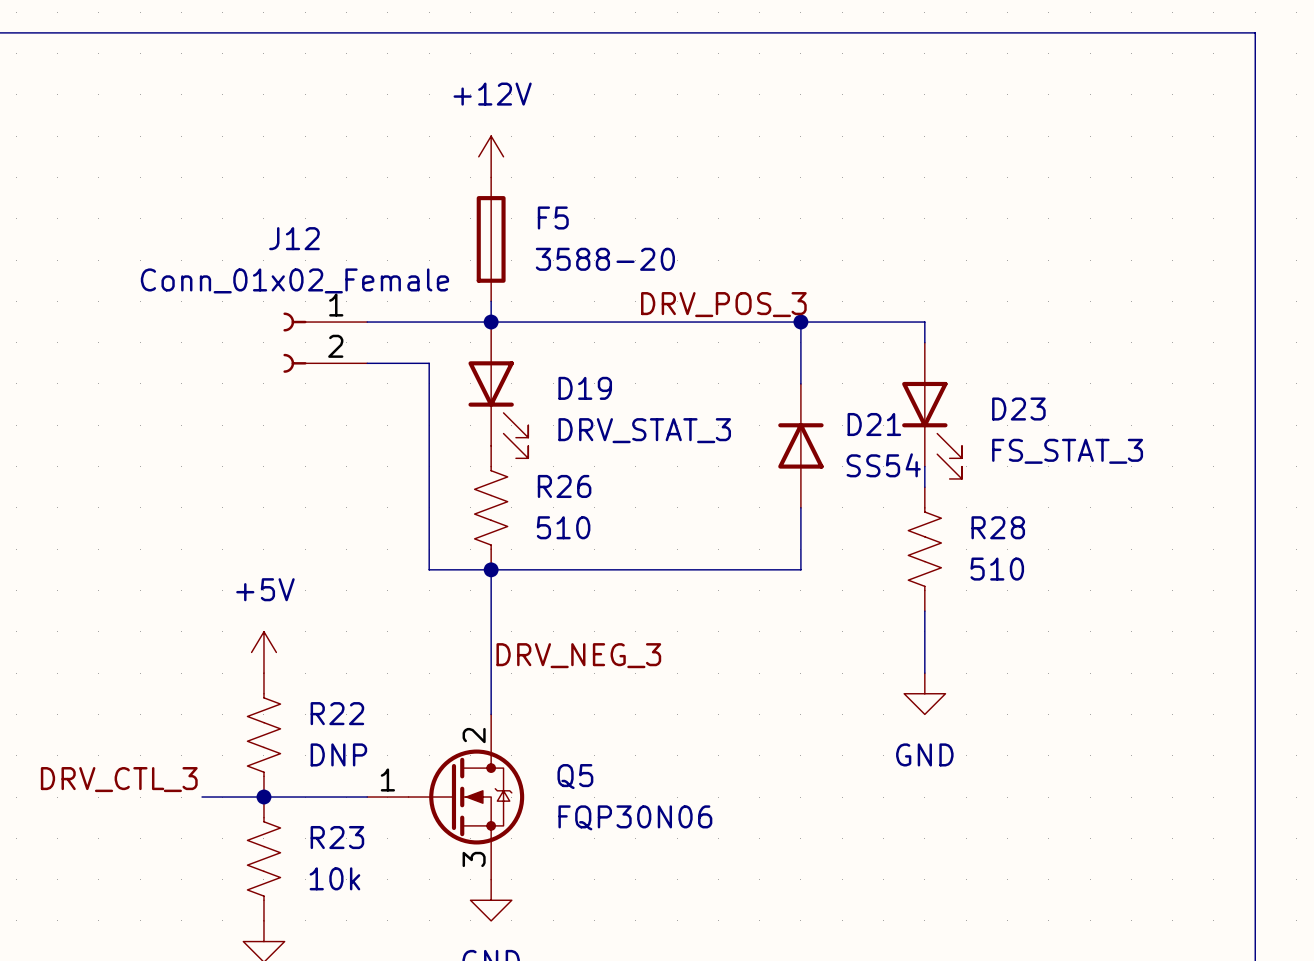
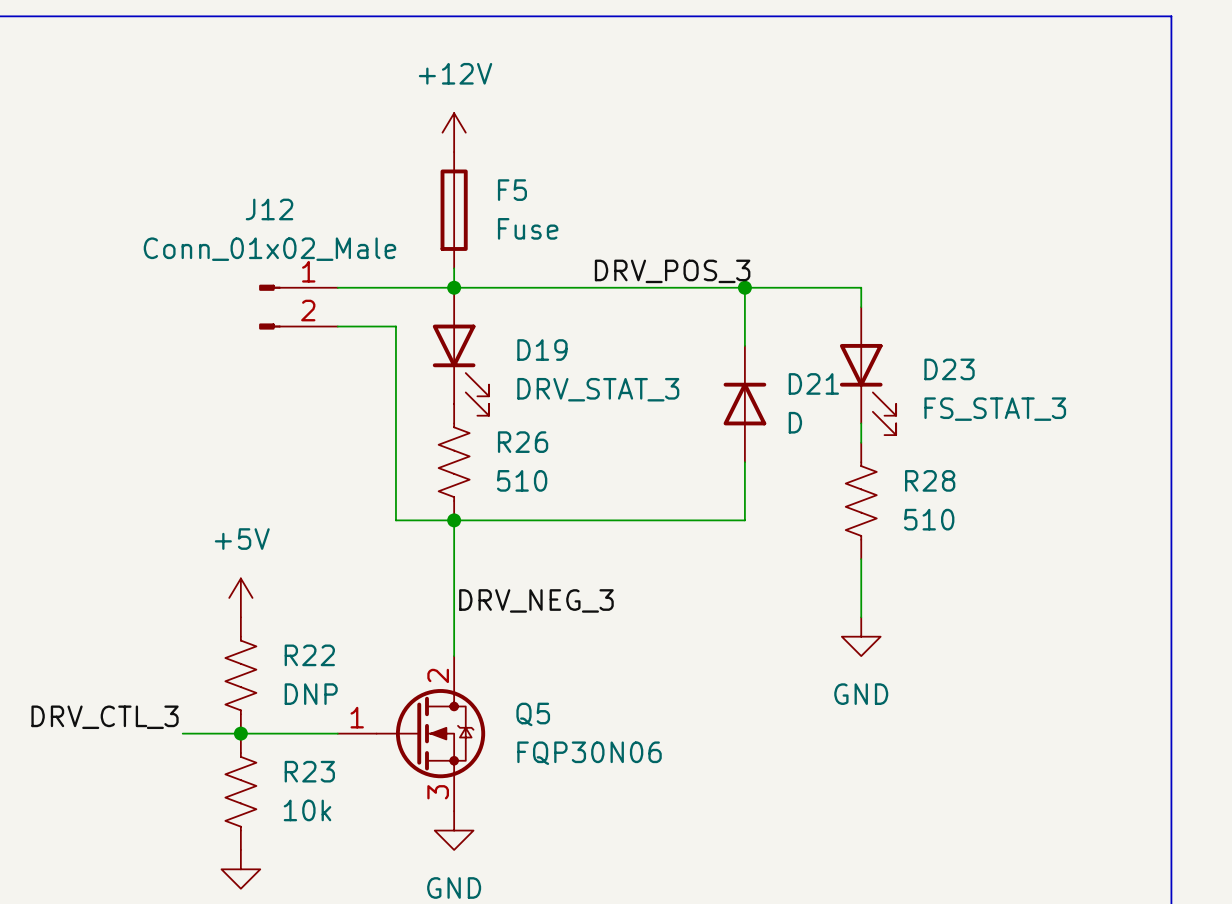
F5 value: 3588-20 (605, 259) -> Fuse (528, 228)
J12 value: Conn_01x02_Female (294, 280) -> Conn_01x02_Male (269, 249)
J12 symbol: [283, 312, 368, 373] -> [259, 284, 338, 330]
D21 value: SS54 (883, 465) -> D (795, 422)

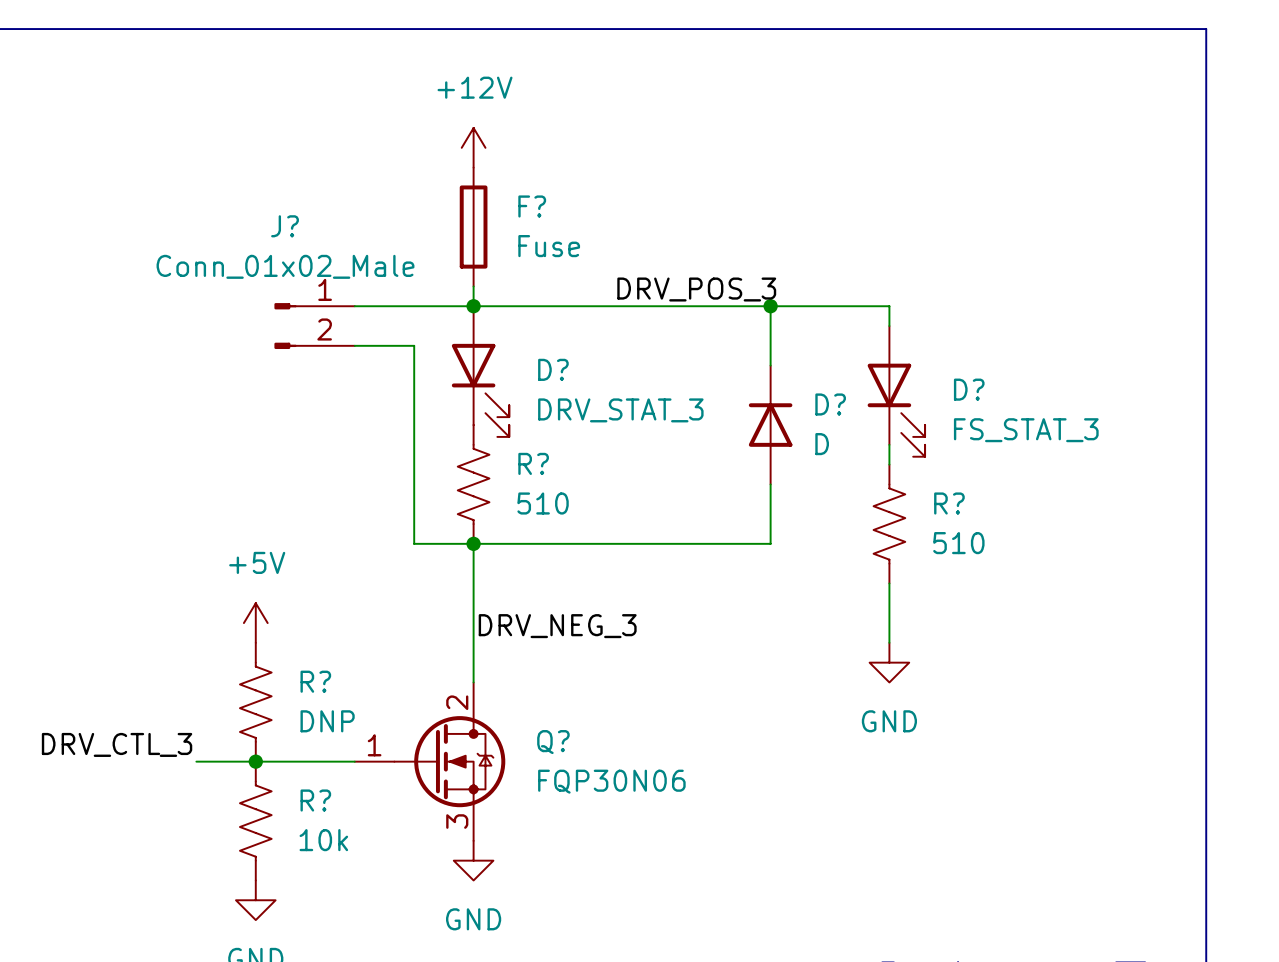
F5 name: F5 (512, 190) -> F? (532, 206)
J12 name: J12 (269, 209) -> J? (285, 226)
D19 name: D19 (542, 350) -> D? (553, 369)
D23 name: D23 (949, 369) -> D? (969, 389)
D21 name: D21 (813, 383) -> D? (830, 404)
R26 name: R26 (523, 442) -> R? (533, 463)
R28 name: R28 (930, 480) -> R? (949, 503)
R22 name: R22 (309, 655) -> R? (315, 681)
Q5 name: Q5 (533, 714) -> Q? (553, 742)
R23 name: R23 (309, 771) -> R? (315, 800)

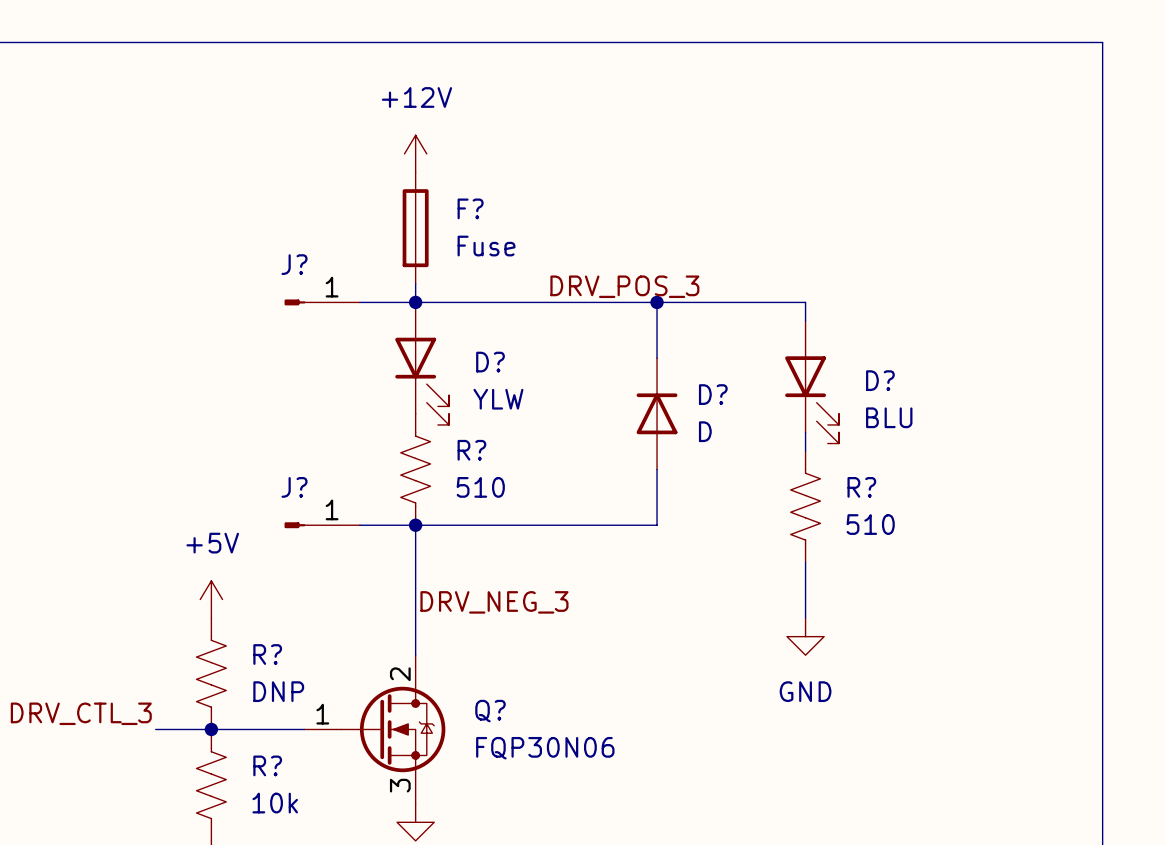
J?: none -> (322, 302)
wire: (770, 306) (770, 365) -> (657, 302) (657, 358)
junction position: (770, 306) -> (657, 302)
J?: Conn_01x02_Male (314, 326) -> none
wire: (354, 345) (414, 345) (414, 543) -> none
D? value: DRV_STAT_3 (620, 410) -> YLW (498, 399)
D? position: (770, 425) -> (657, 413)
D? value: FS_STAT_3 (1026, 430) -> BLU (889, 417)
wire: (770, 484) (770, 543) (731, 543) -> (657, 469) (657, 525)
J?: none -> (322, 525)

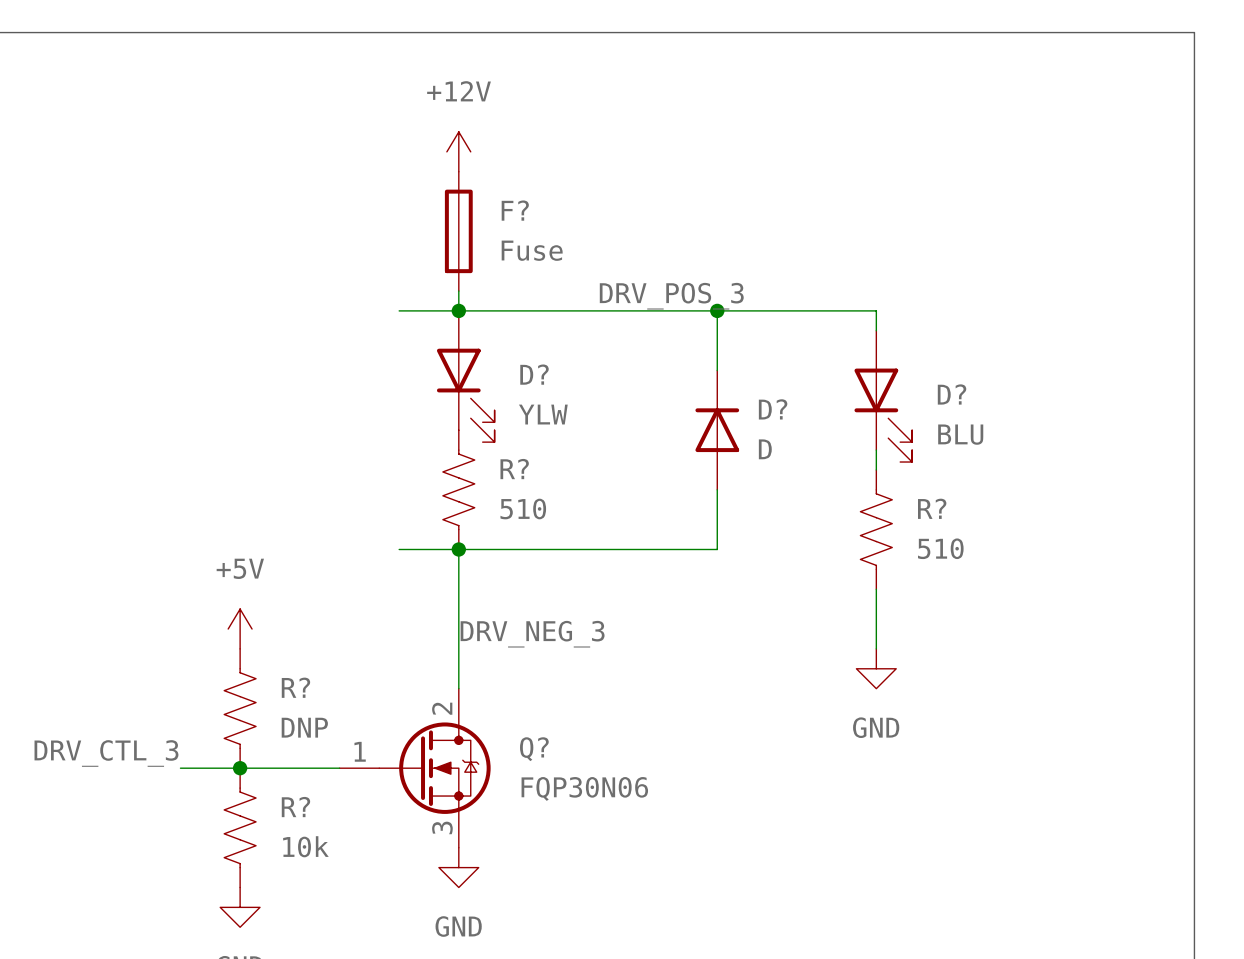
J?: (322, 302) -> none
J?: (322, 525) -> none

